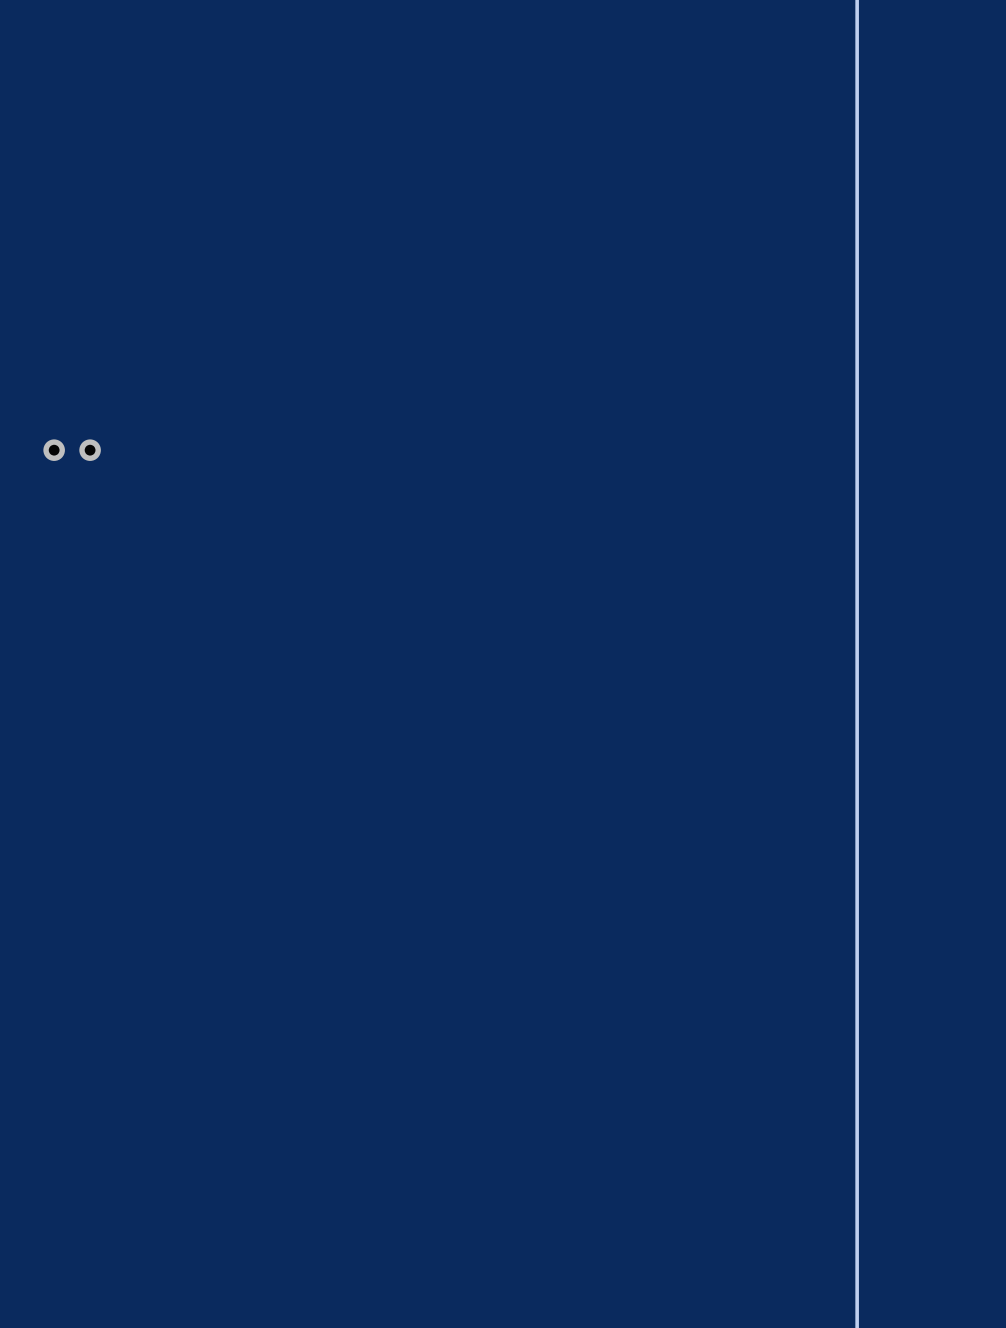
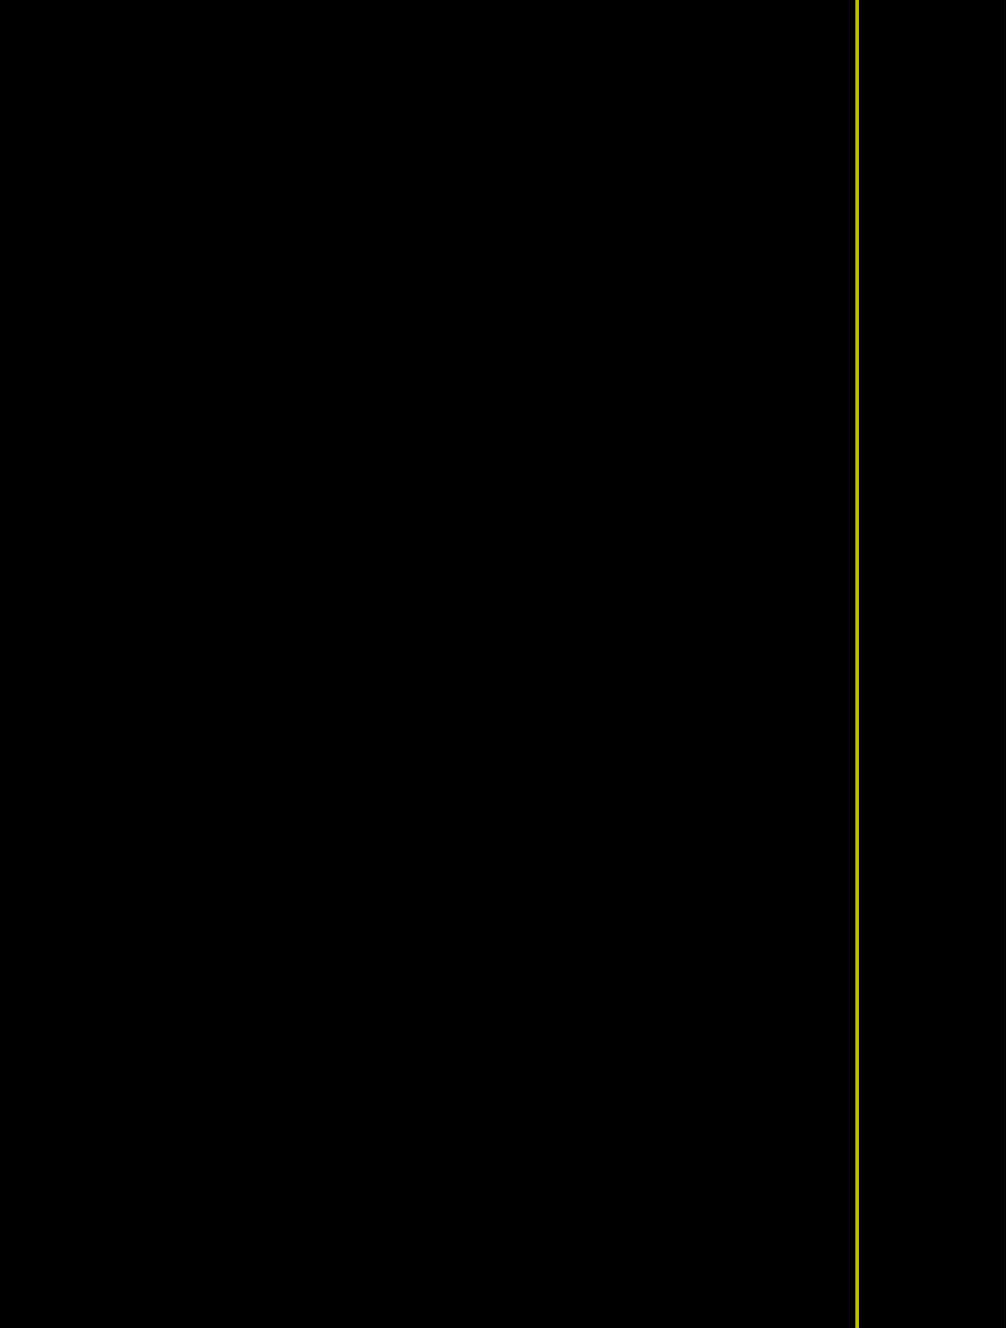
via: (54, 450) -> none
via: (90, 450) -> none

